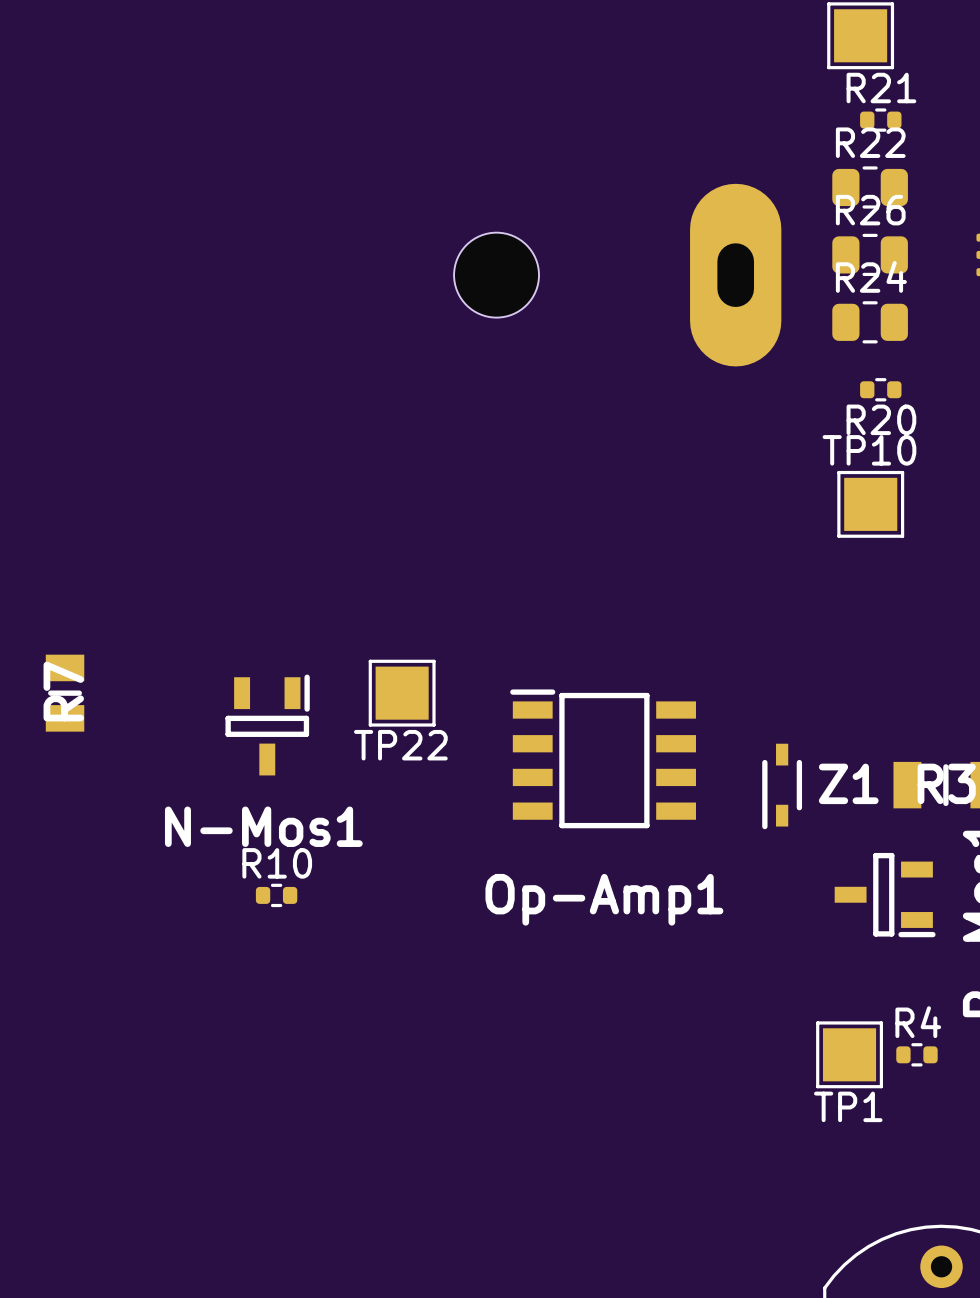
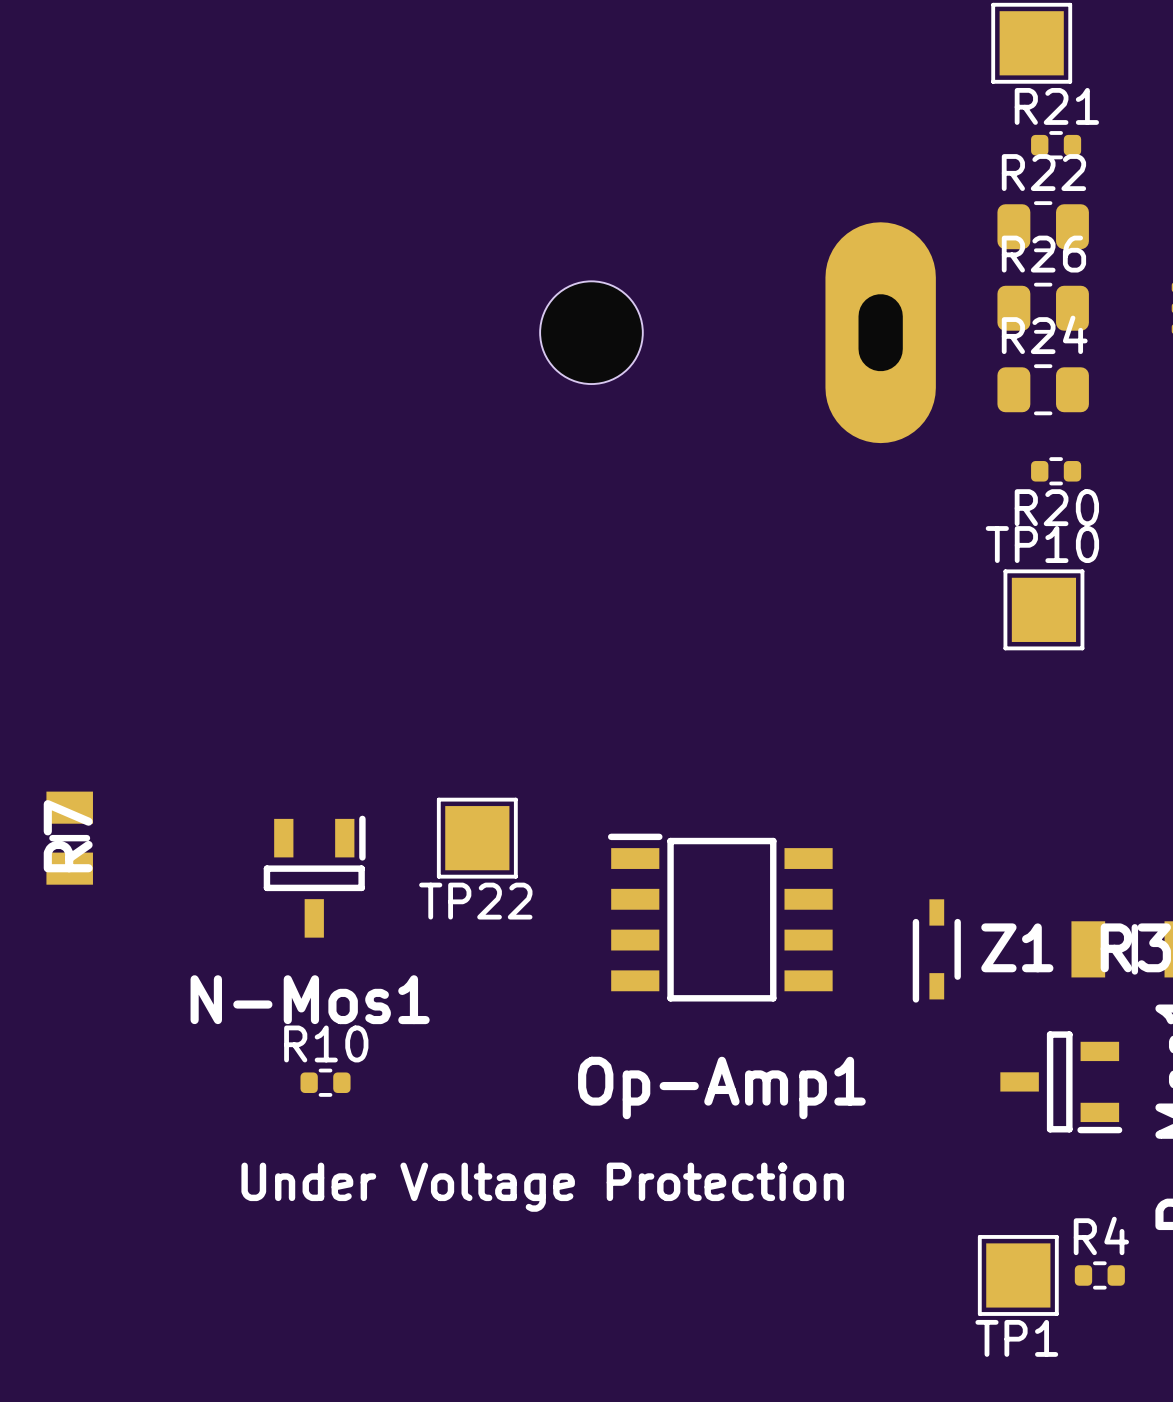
text: none -> Under Voltage Protection (542, 1187)

